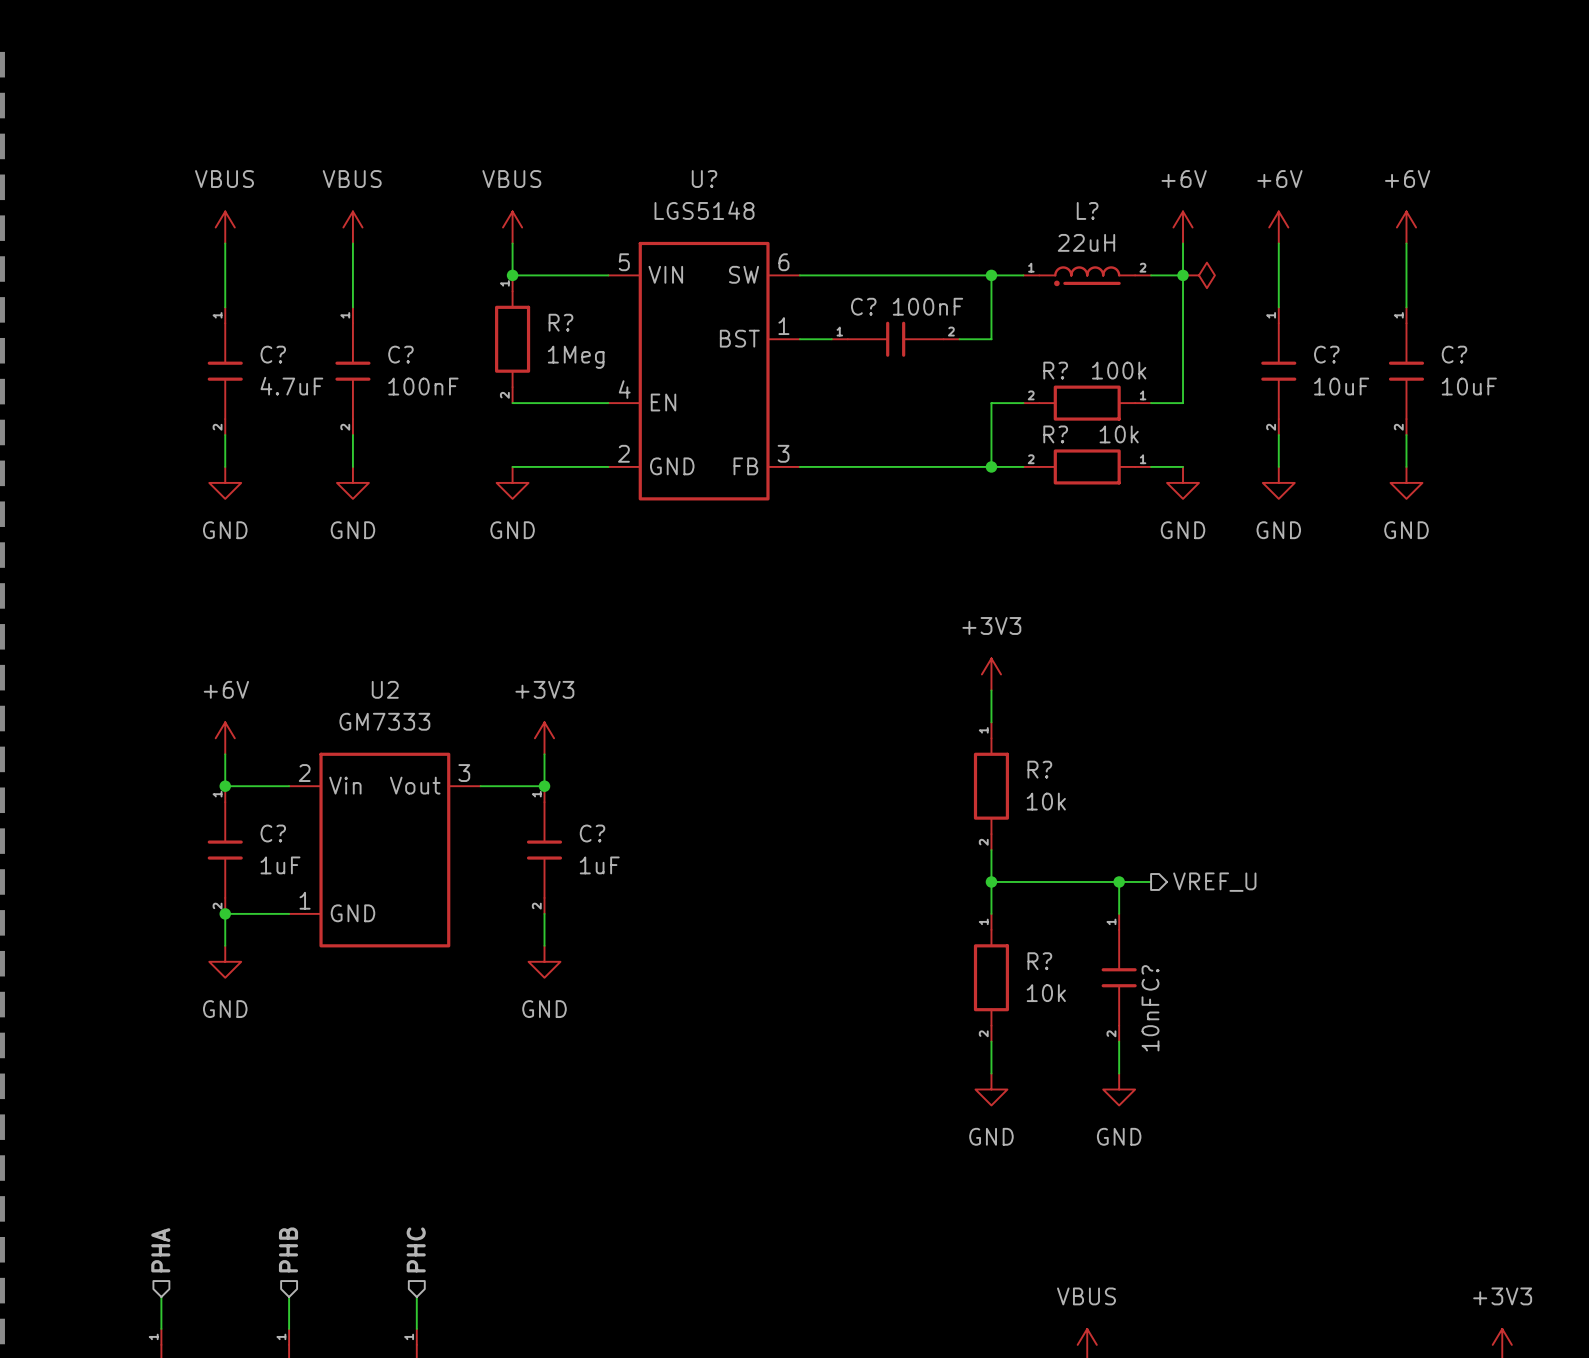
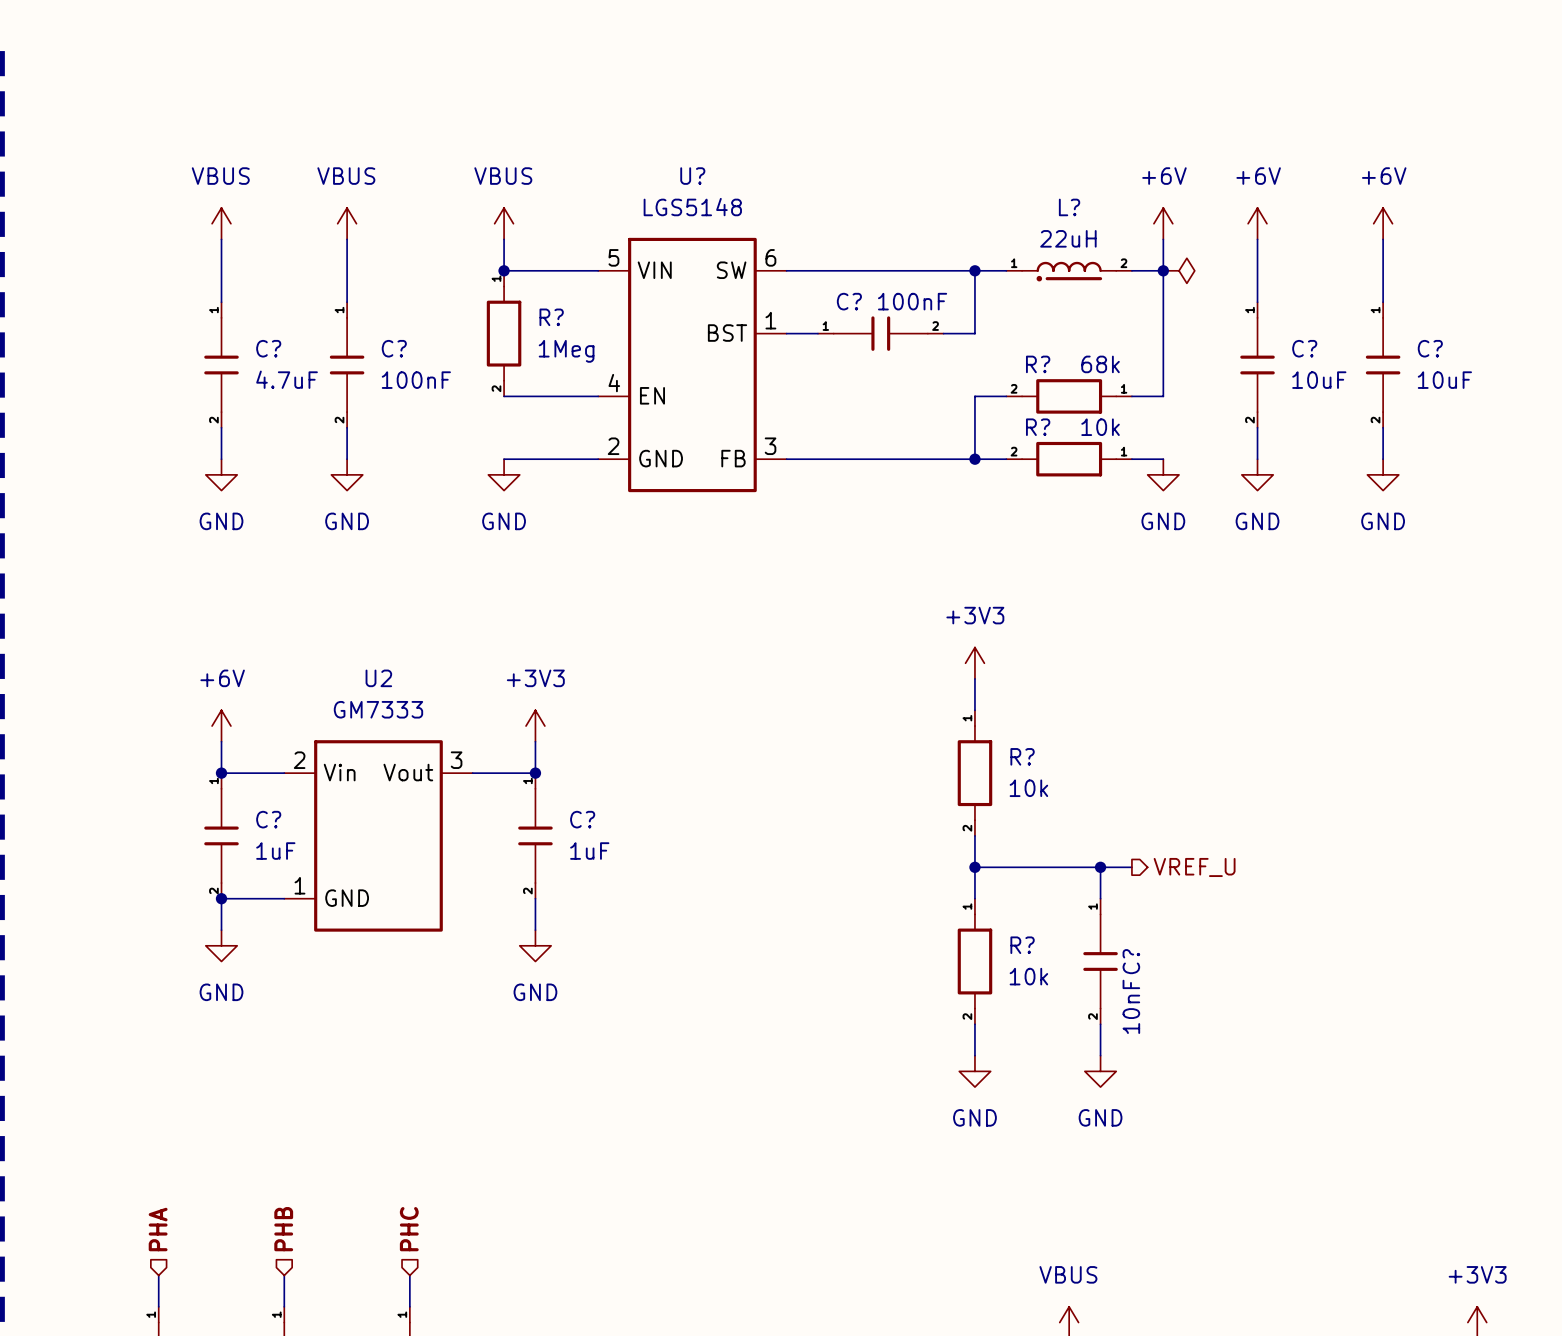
R? value: 100k (1119, 370) -> 68k (1100, 364)

